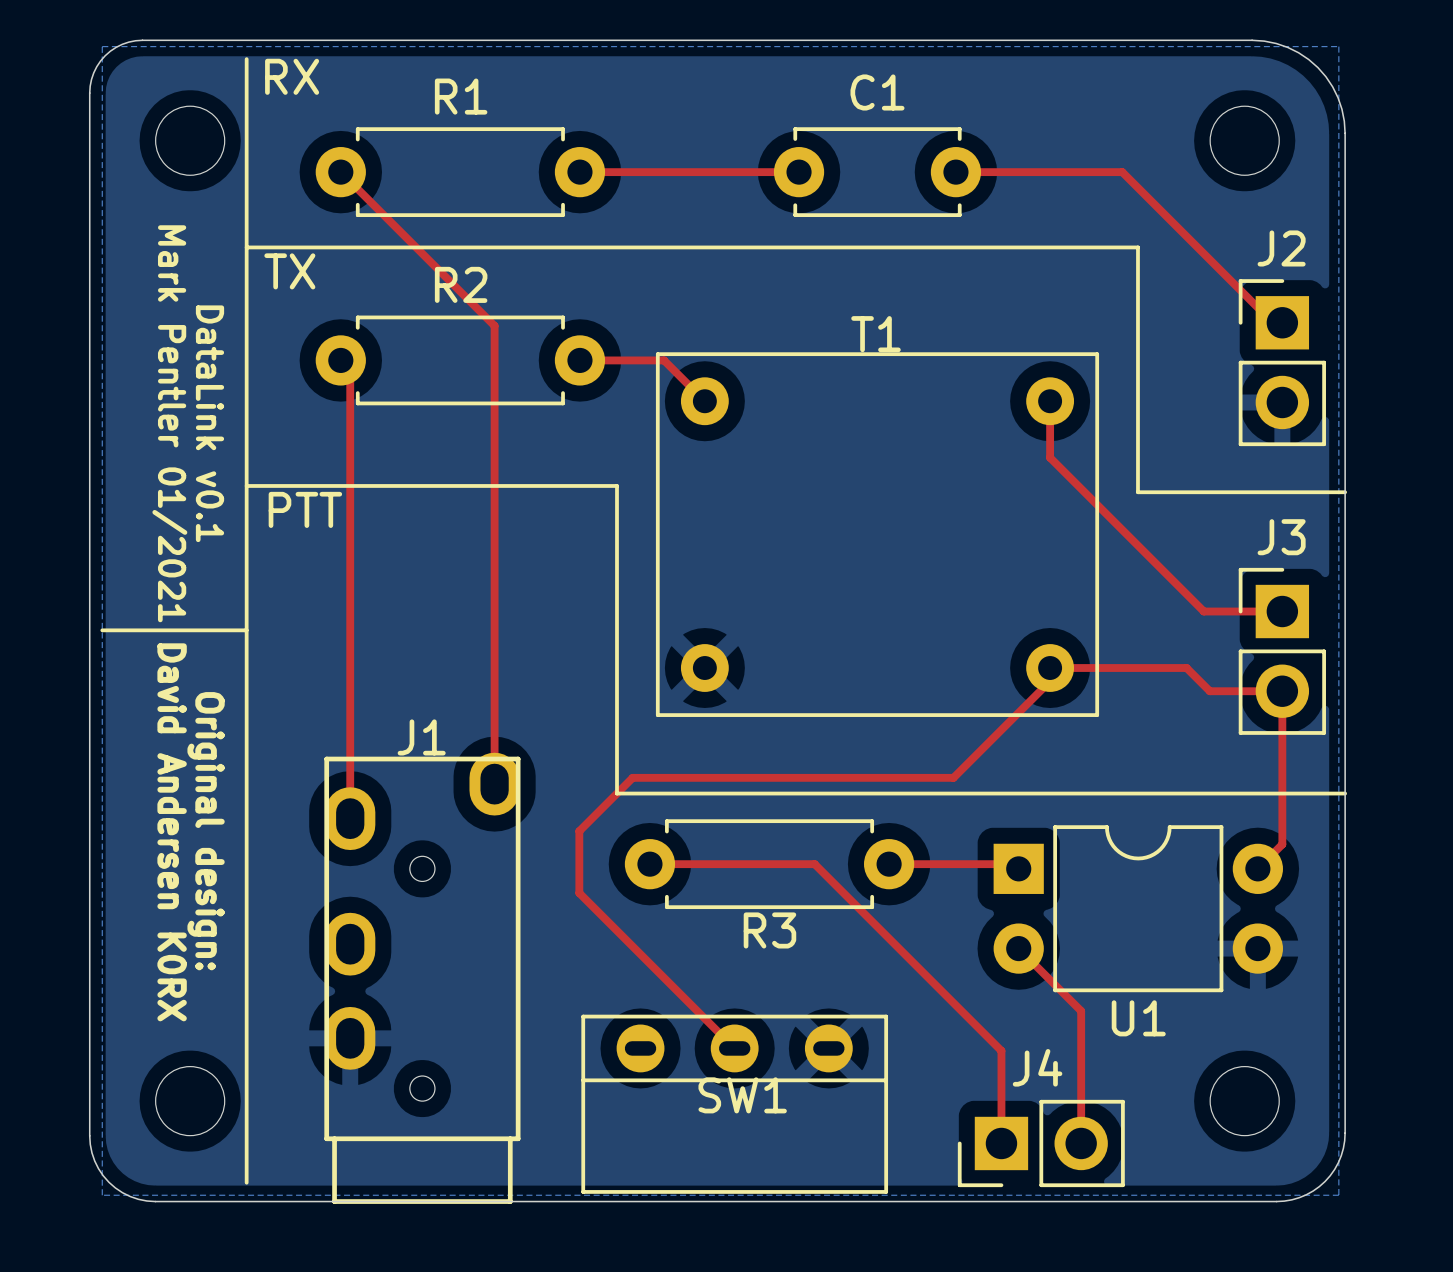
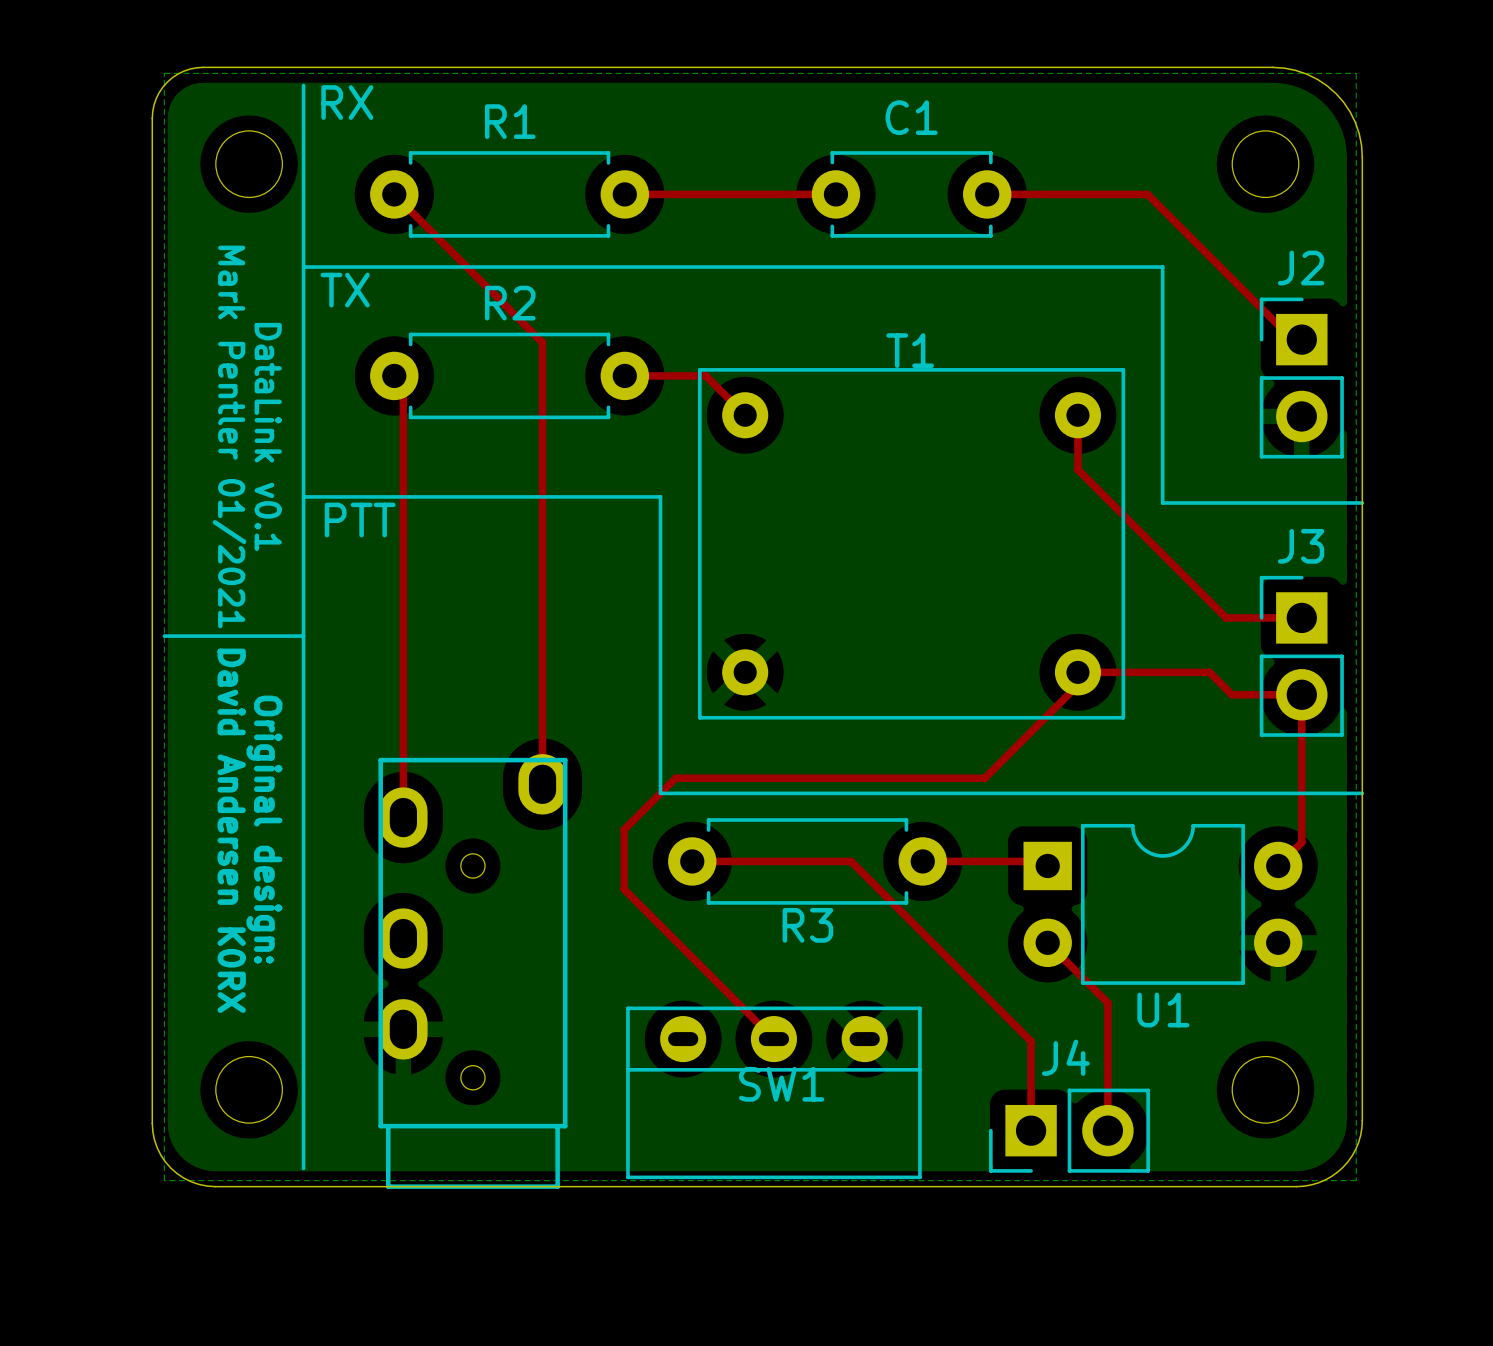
J1 name: J1 (421, 737) -> none

